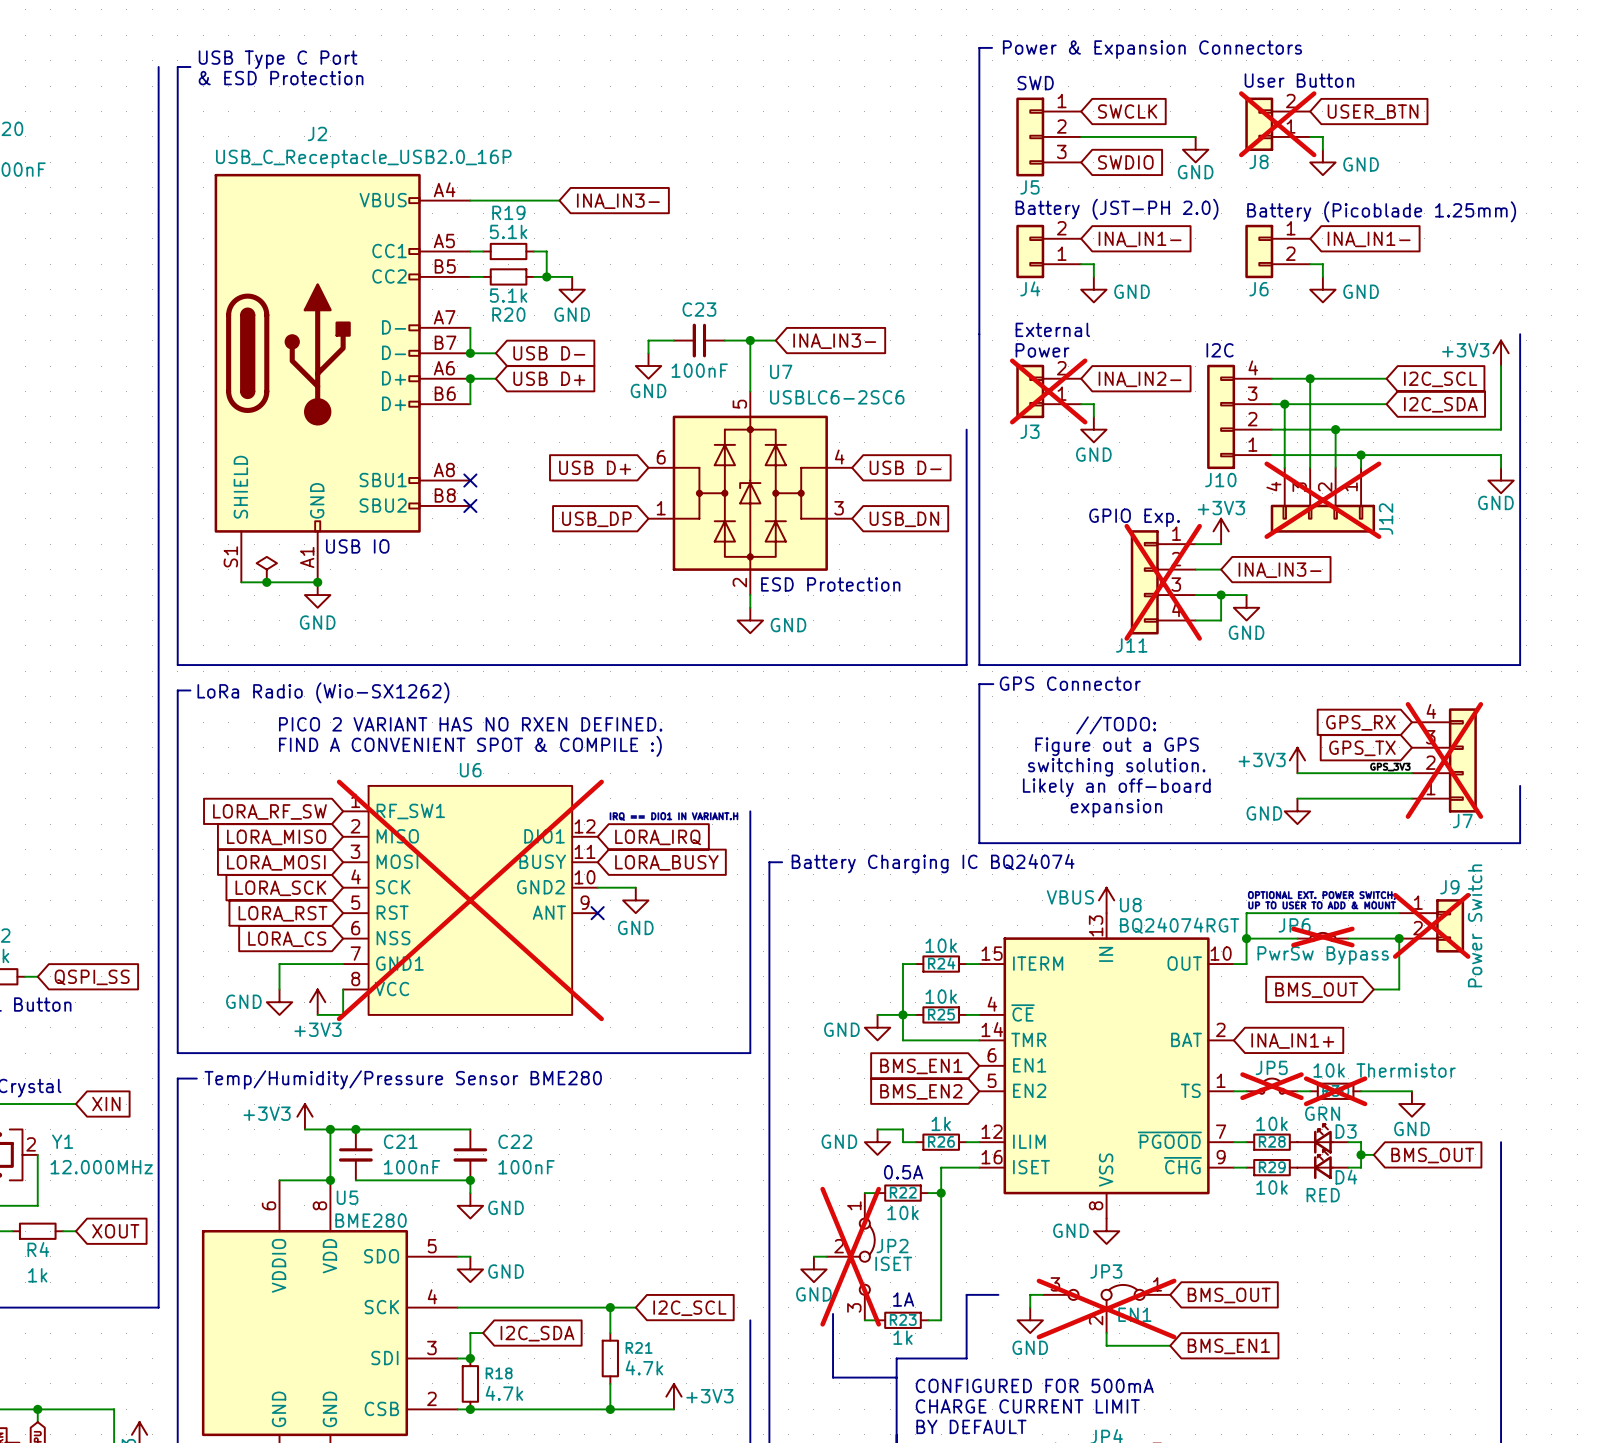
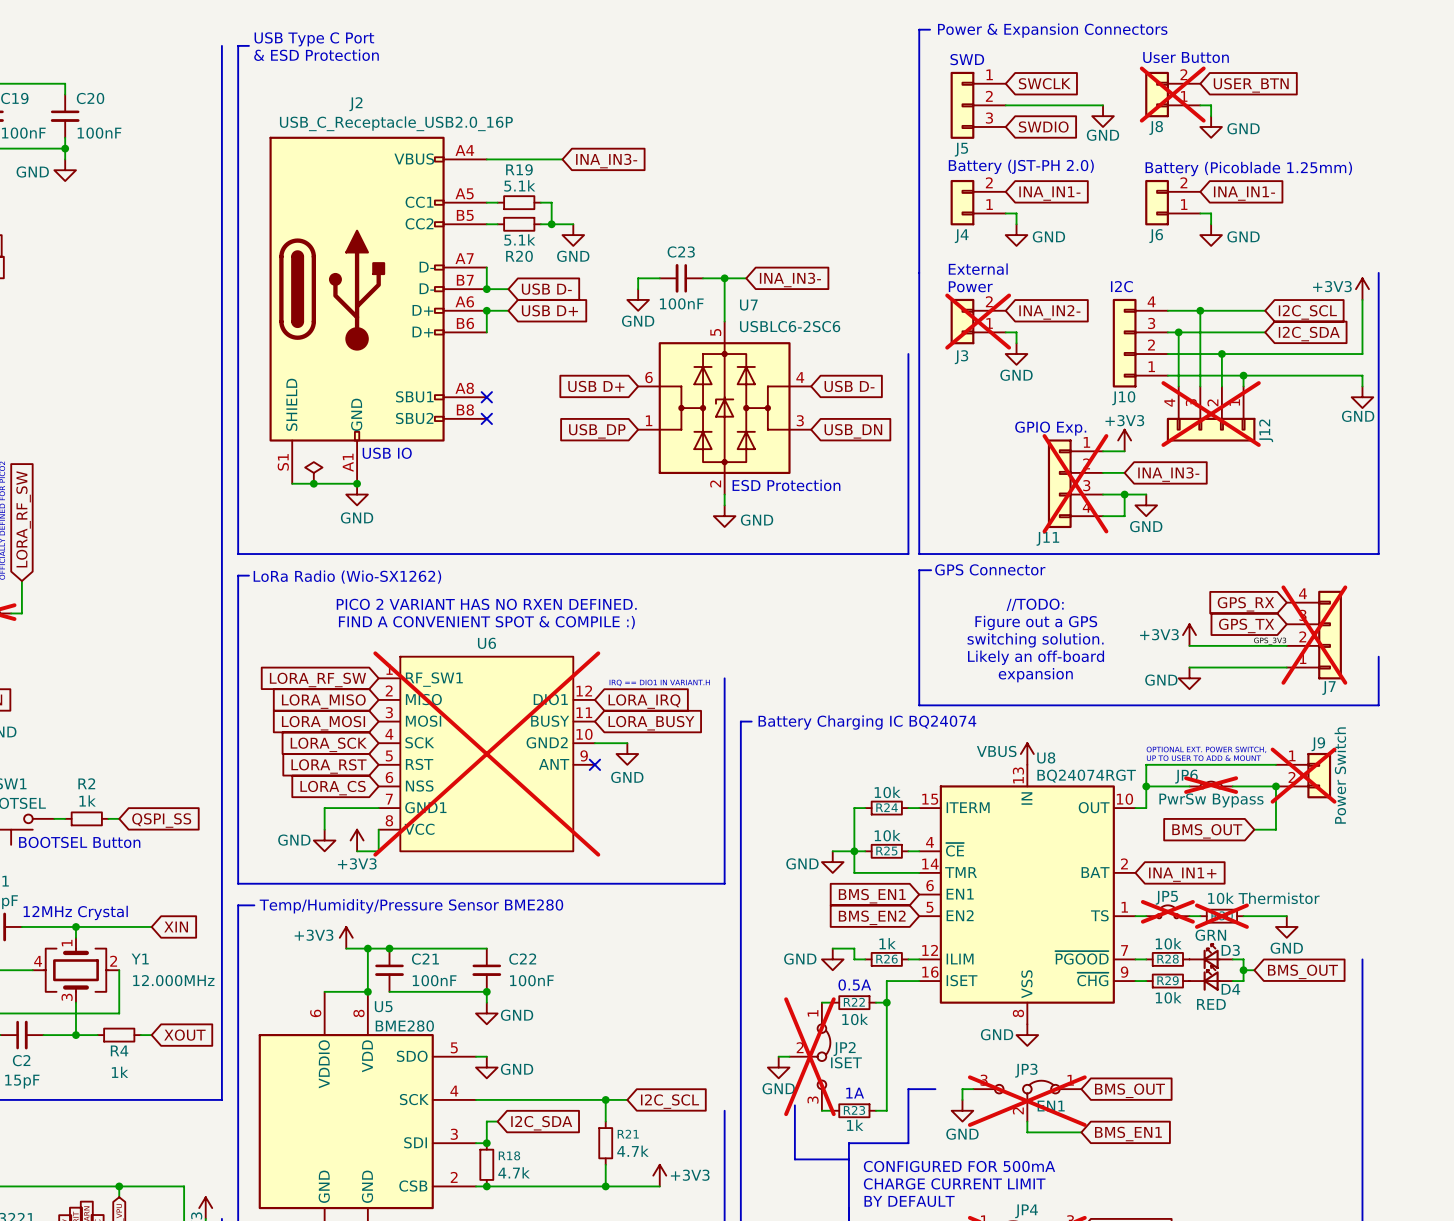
J6 flip: as is (1259, 251) -> up-down (1157, 202)

